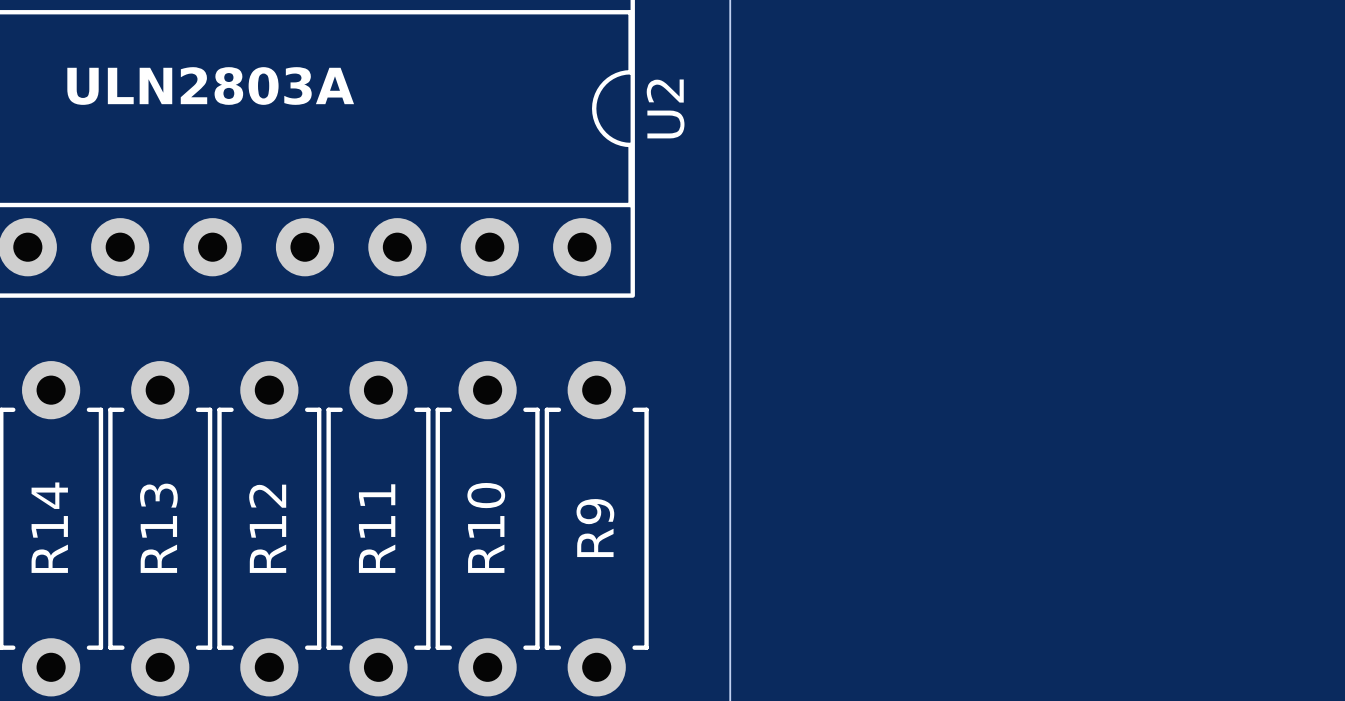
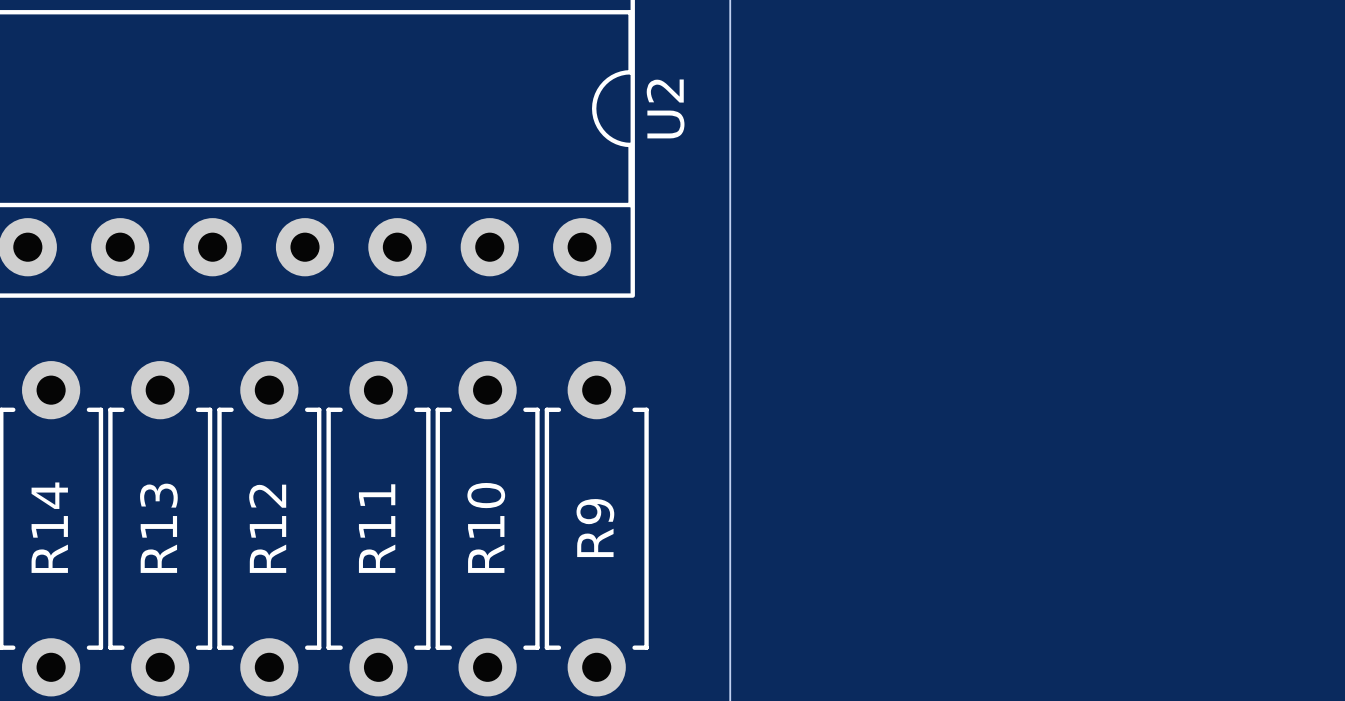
text: ULN2803A (210, 86) -> none

